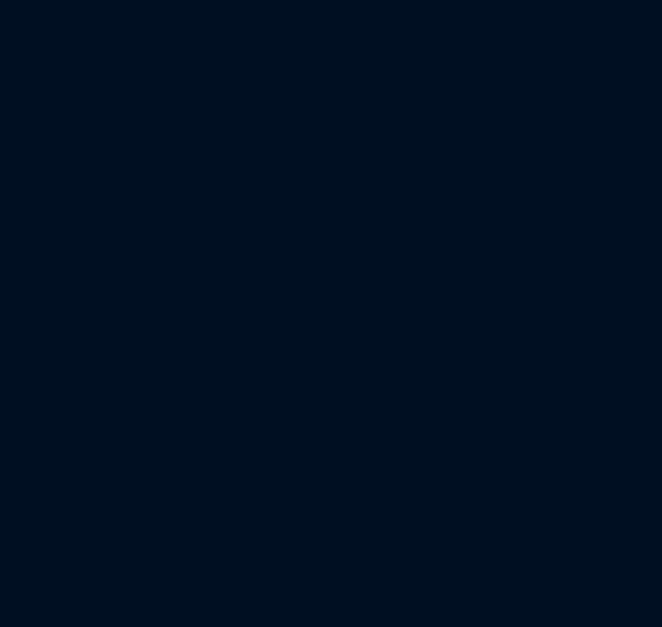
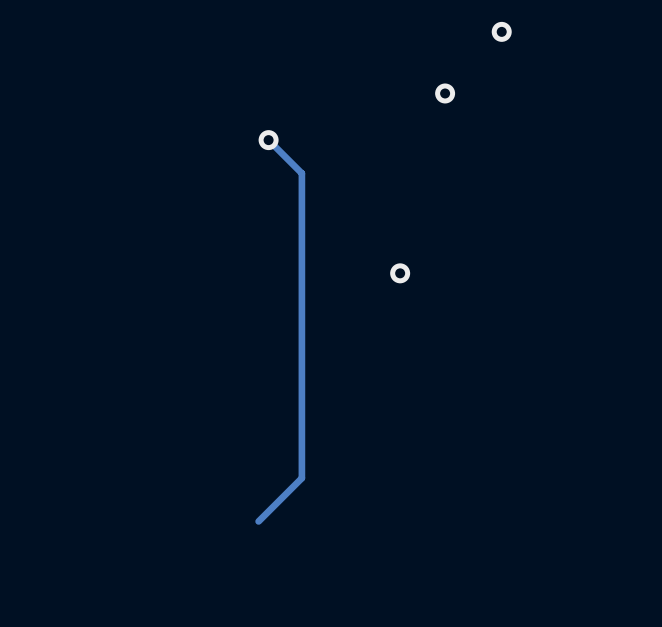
via: none -> (501, 31)
via: none -> (445, 93)
track: none -> (268, 140) (301, 173) (301, 478) (258, 521)
via: none -> (268, 140)
via: none -> (400, 273)

